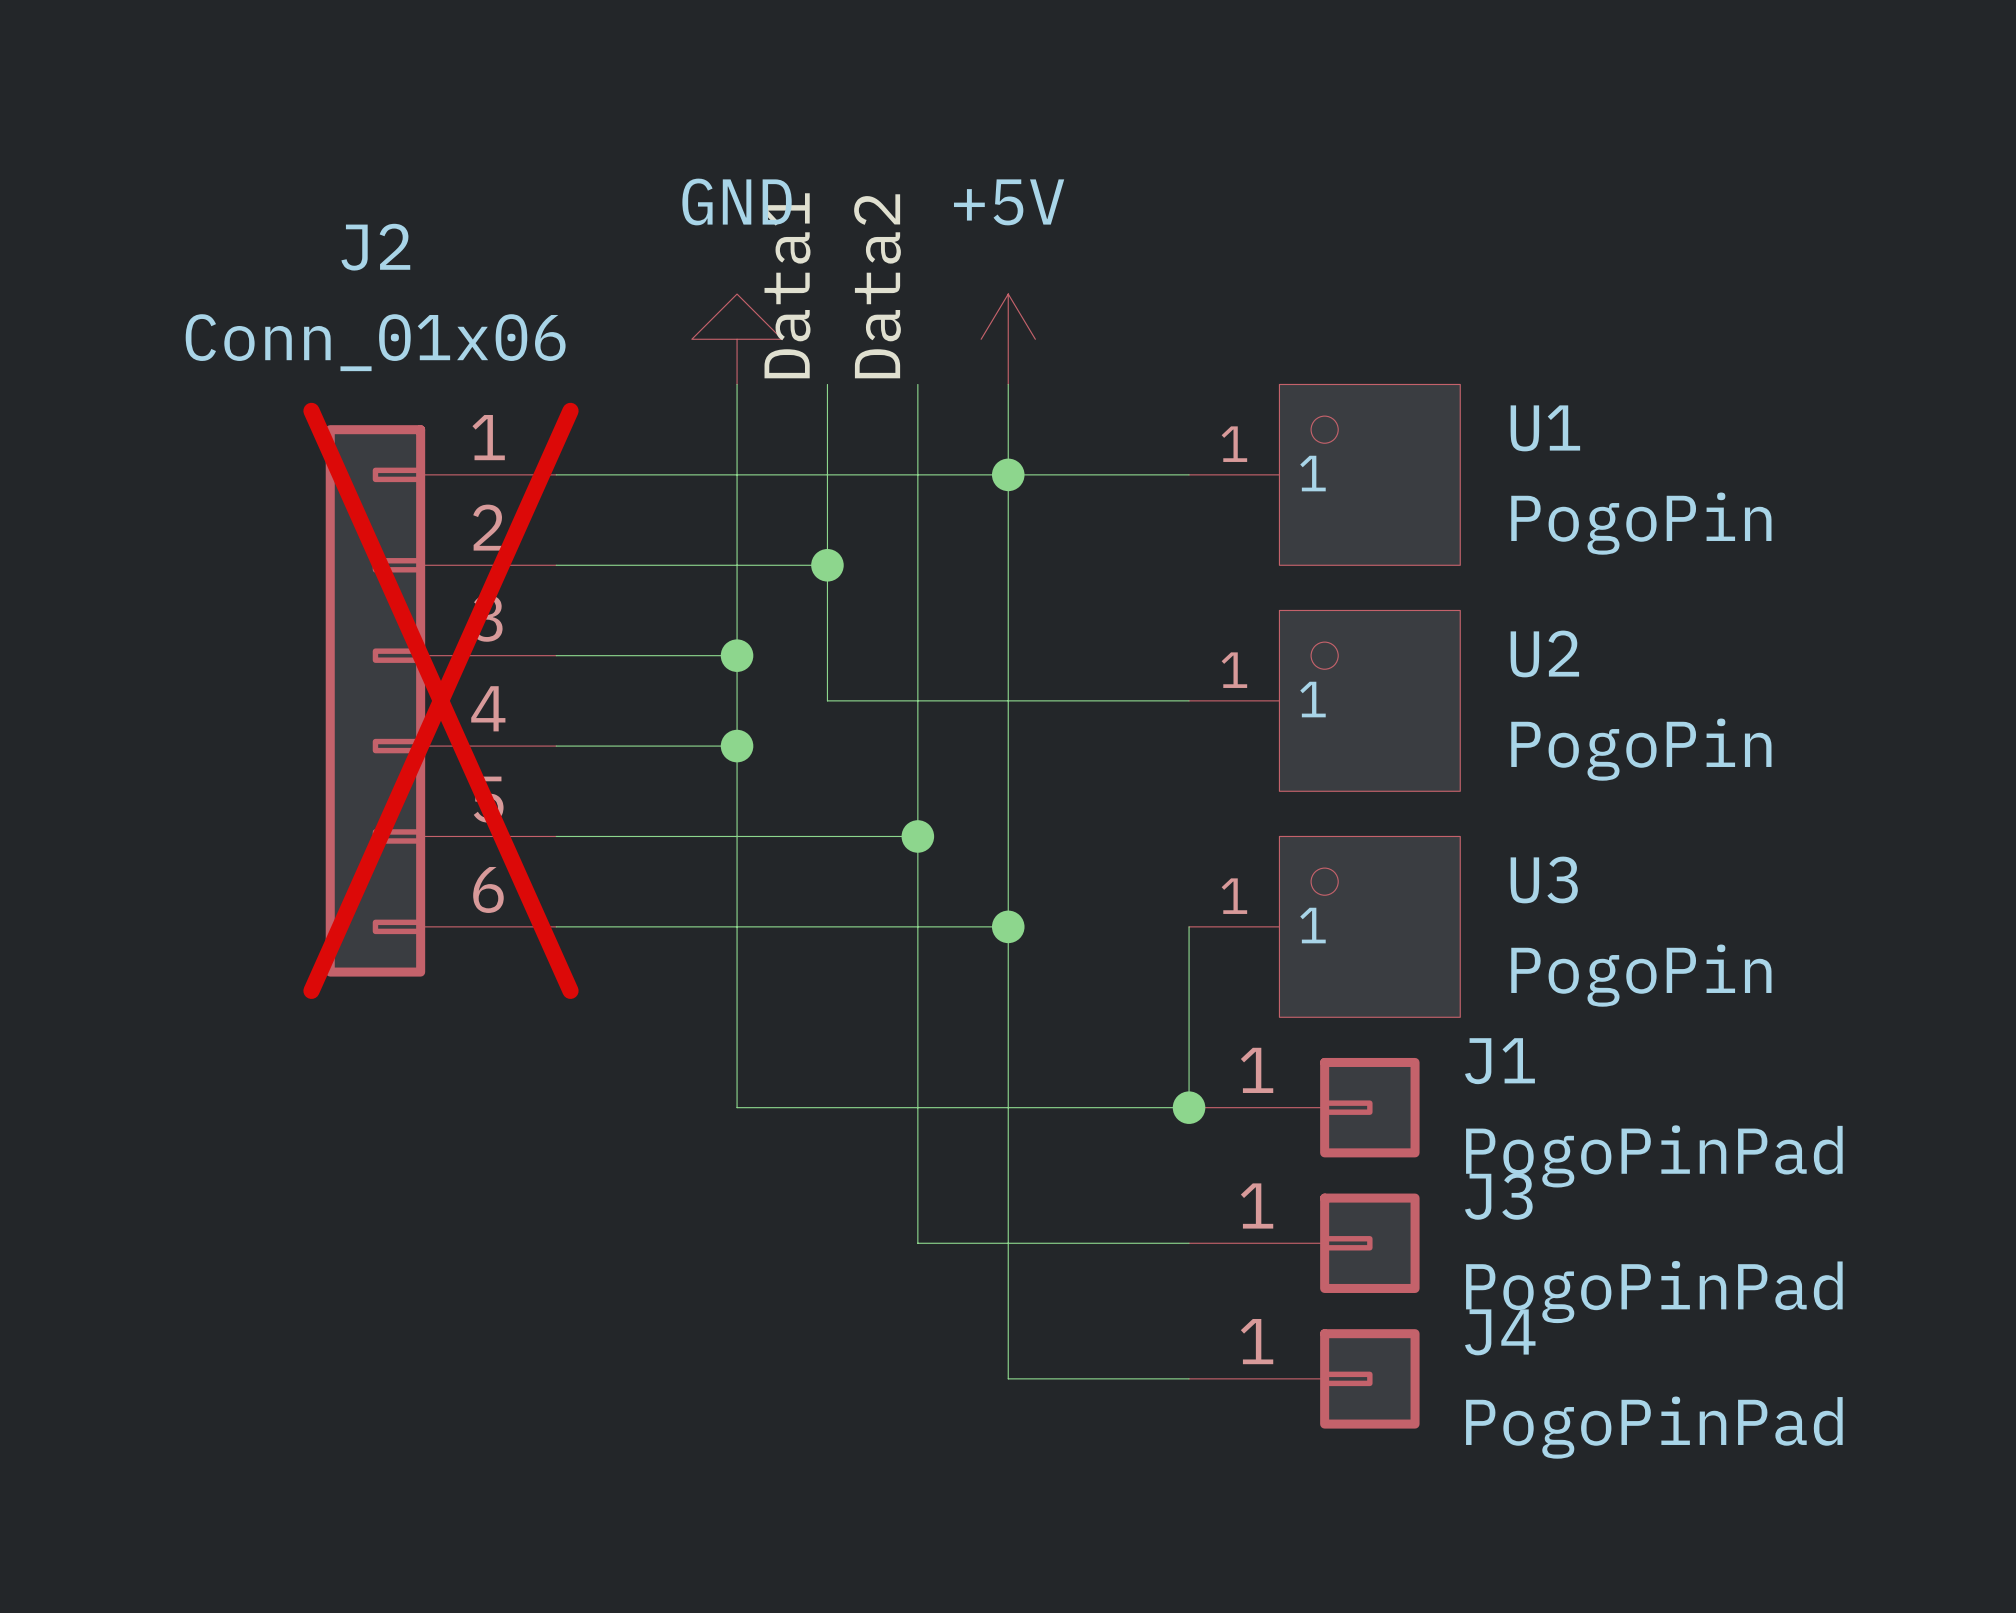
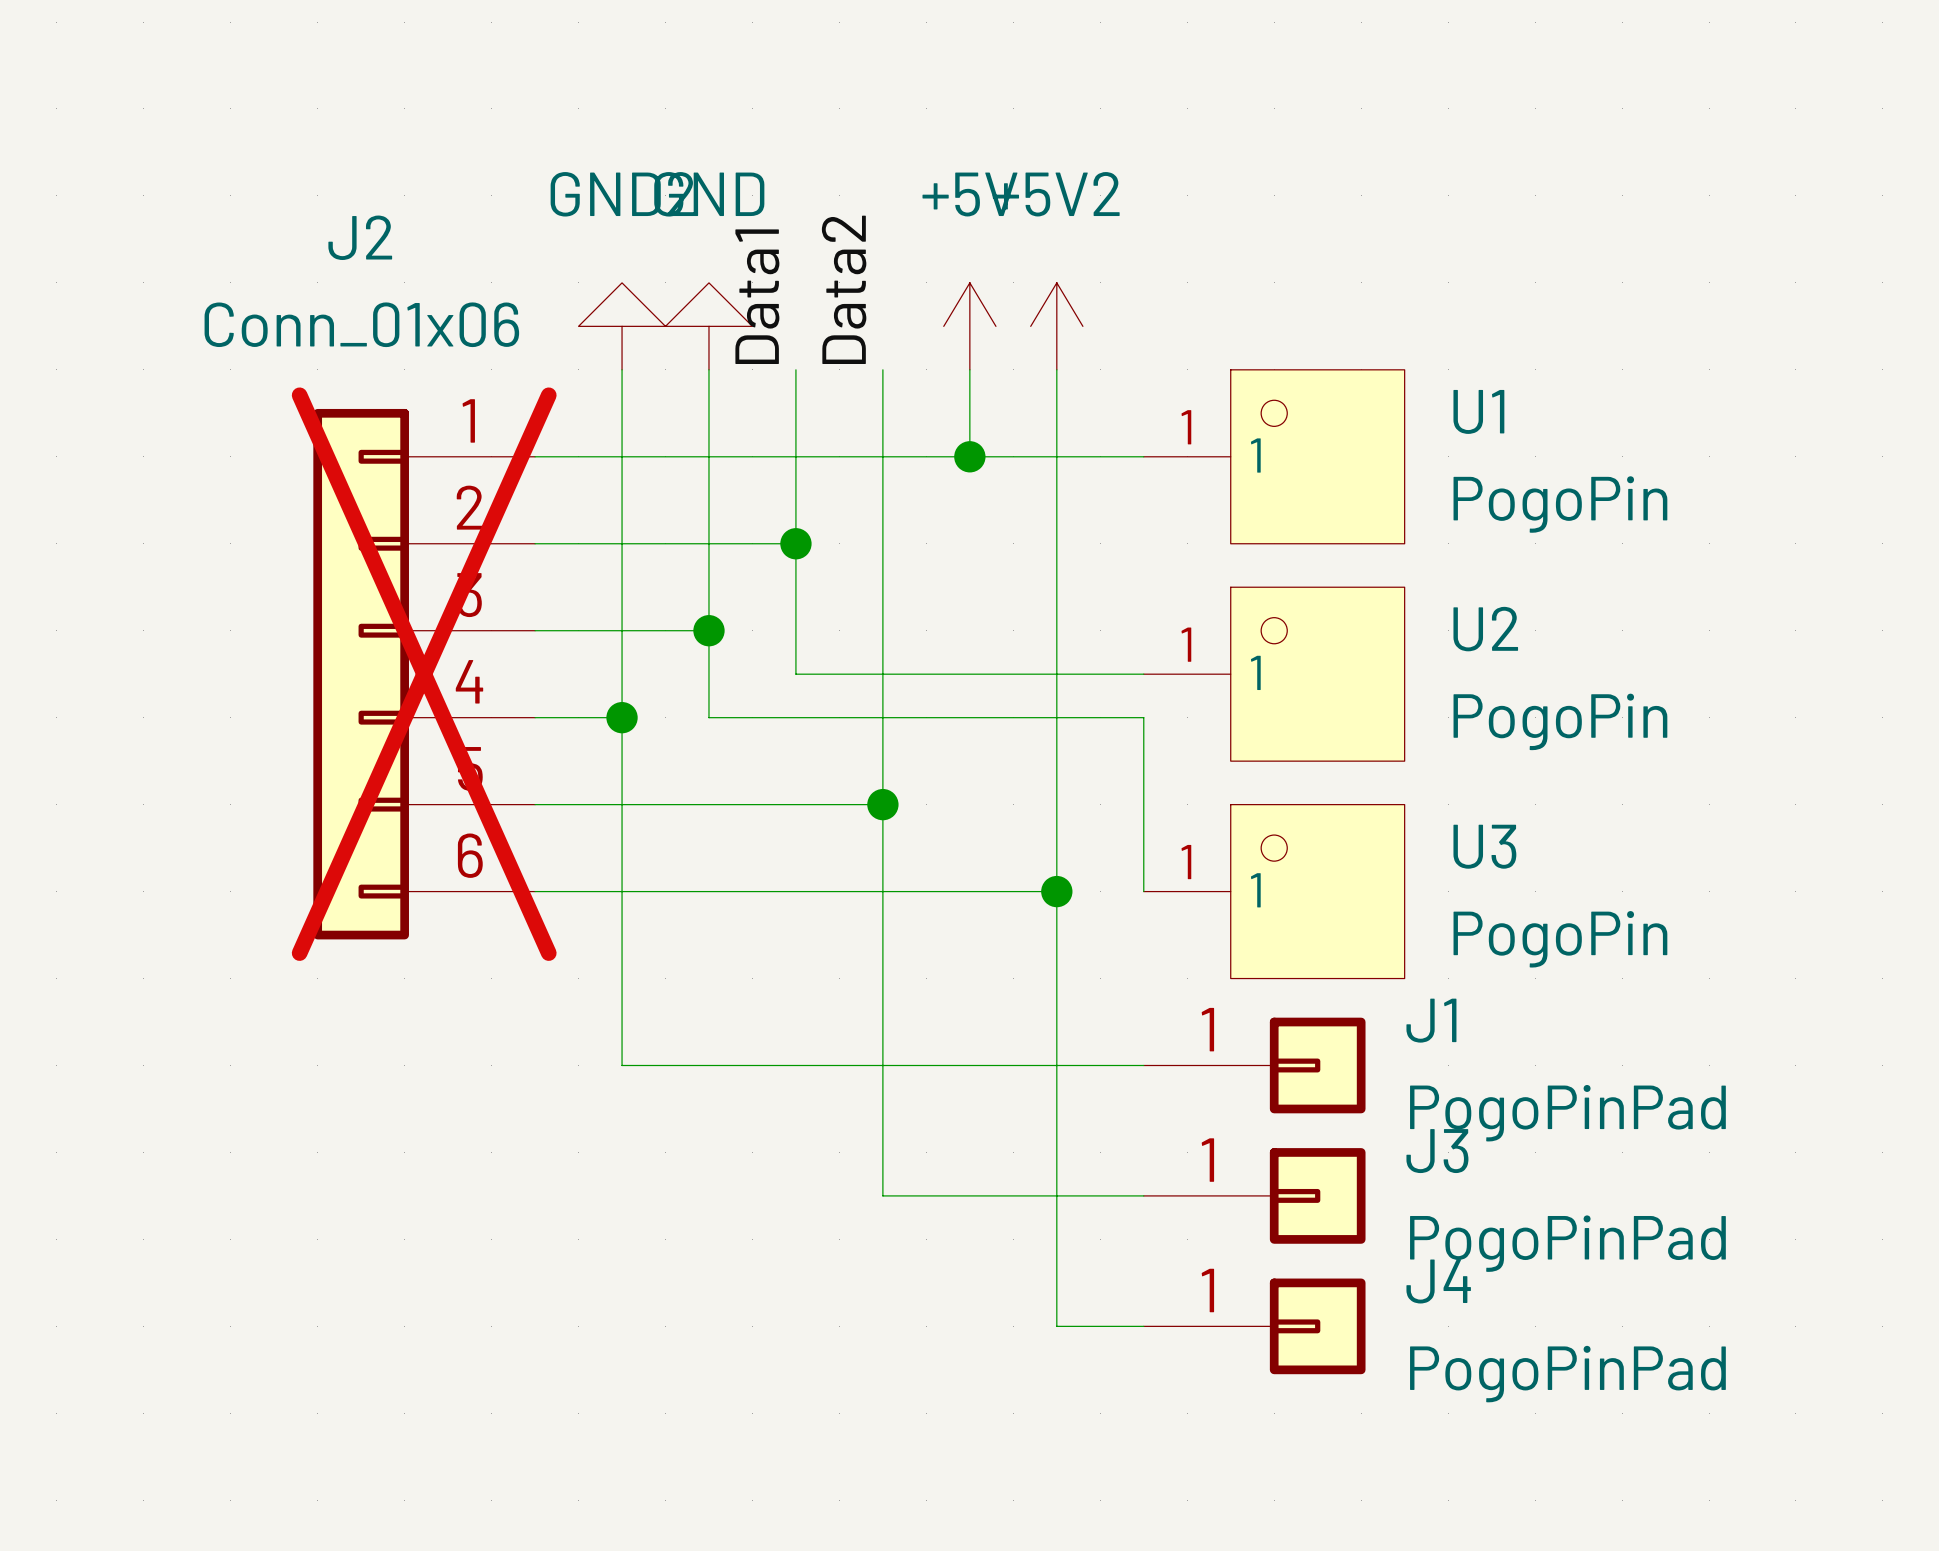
power symbol: none -> GND2 (622, 326)
power symbol: none -> +5V2 (1056, 326)
wire: (1008, 474) (1008, 1378) (1098, 1378) -> (1056, 369) (1056, 1326)
wire: (646, 746) (737, 746) (737, 1107) -> (622, 369) (622, 1065) (708, 1065)
junction position: (737, 746) -> (622, 717)
wire: none -> (969, 891) (1056, 891)
junction position: (1008, 926) -> (1056, 891)
wire: (1189, 926) (1189, 1107) -> (1143, 891) (1143, 717) (708, 717)
junction: (1189, 1107) -> none

